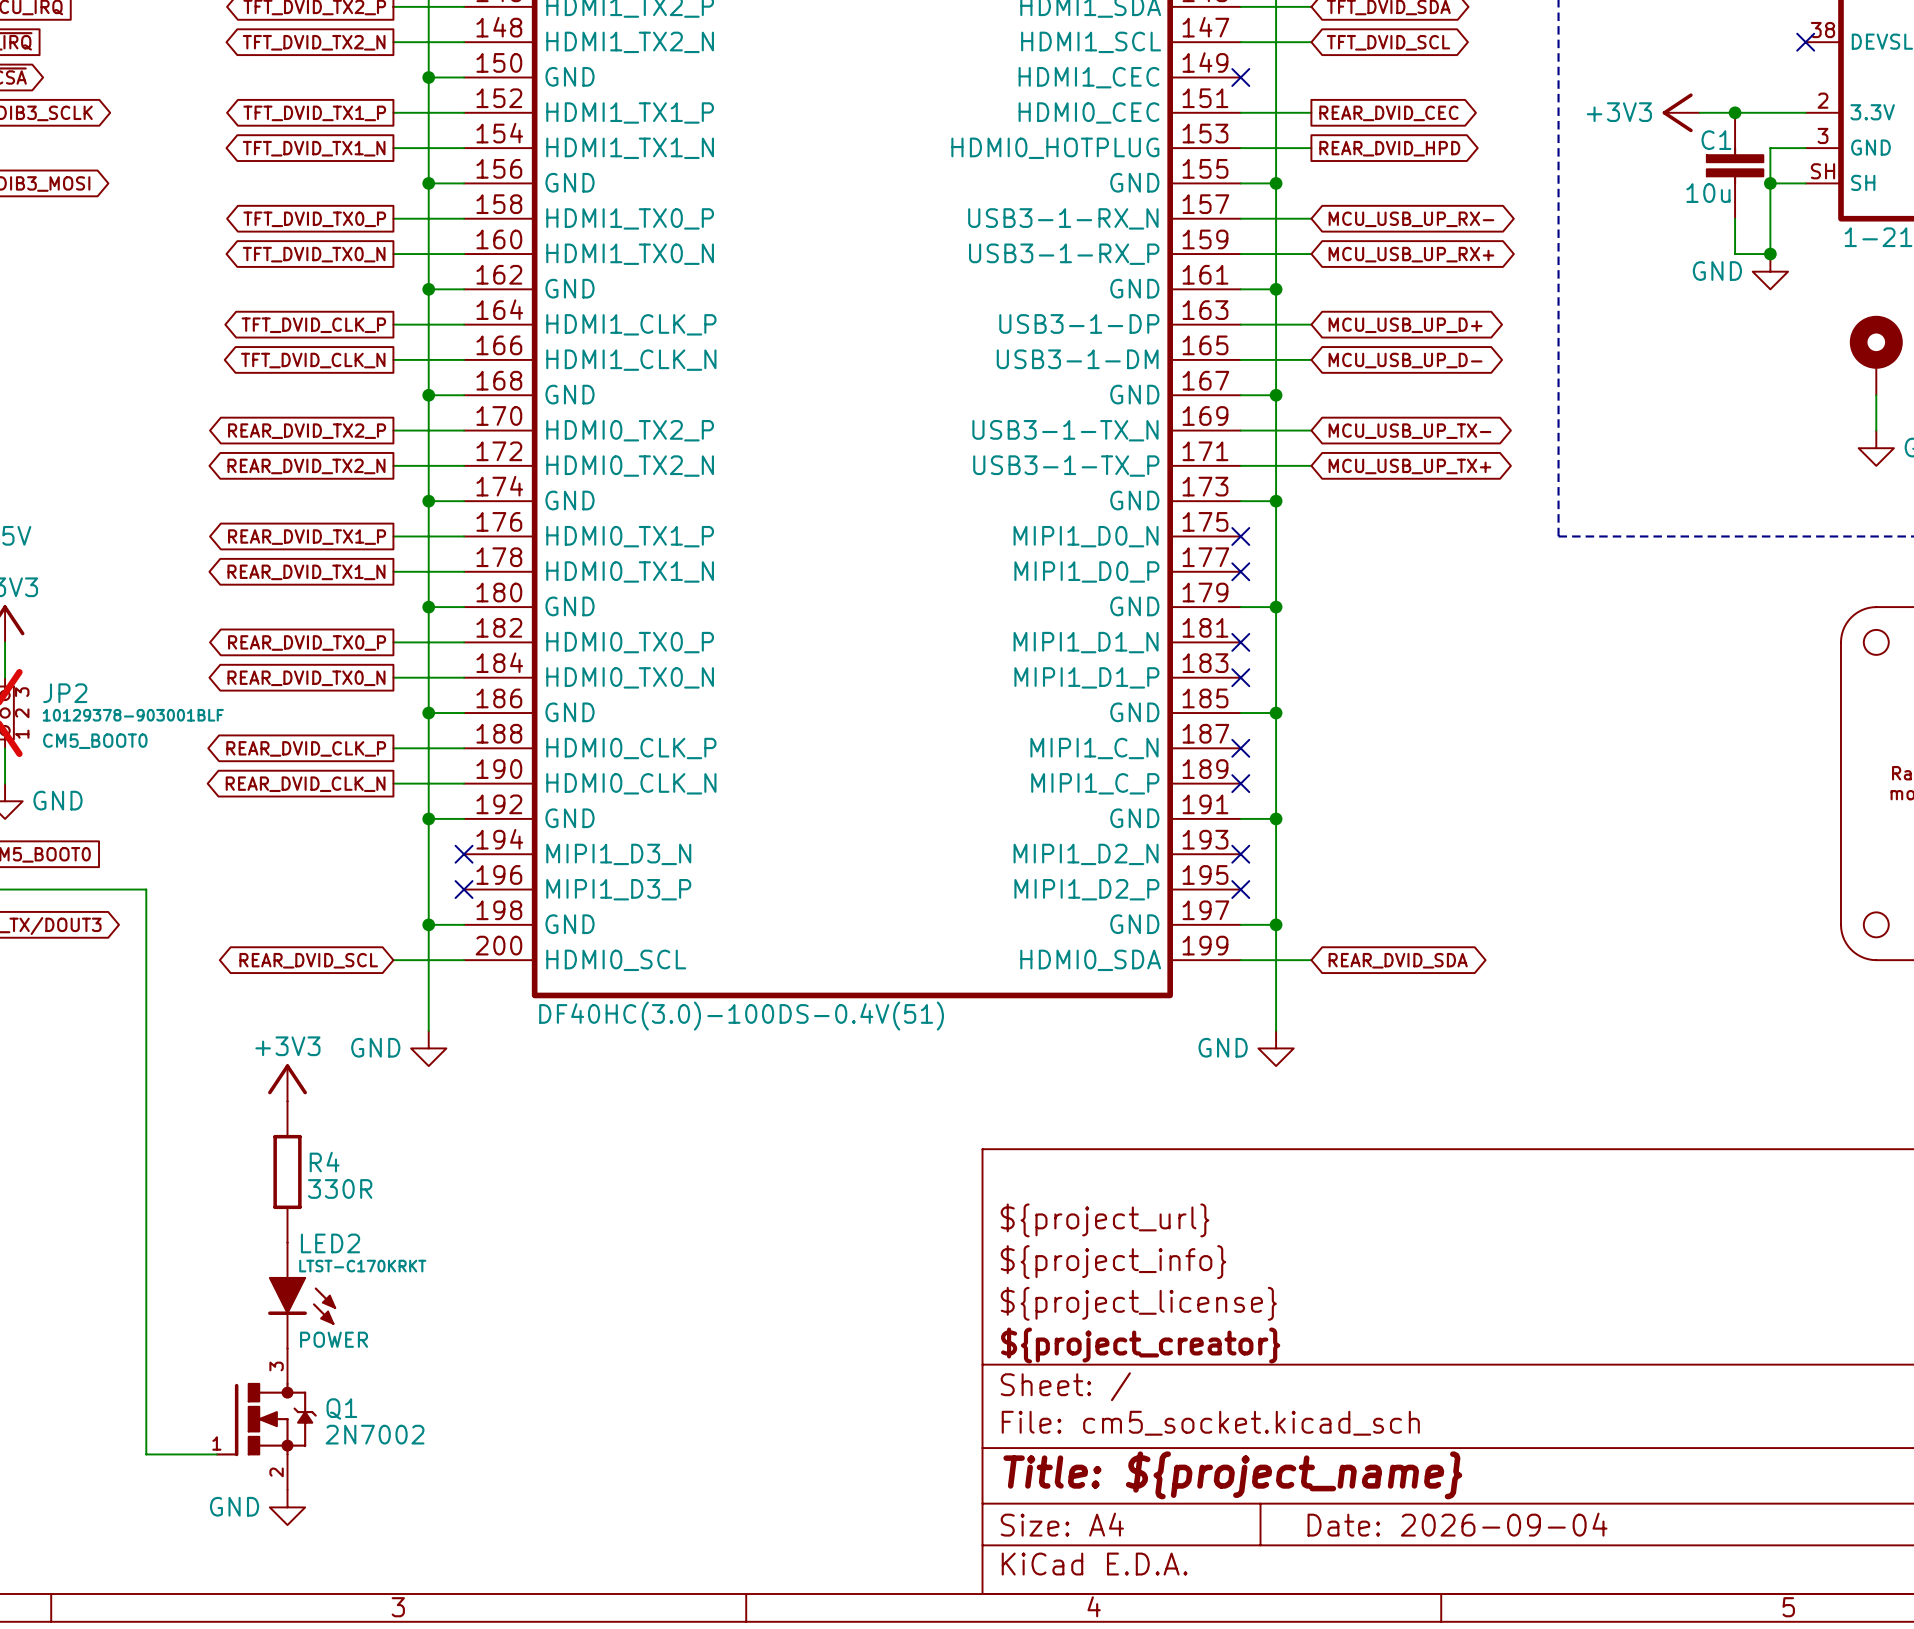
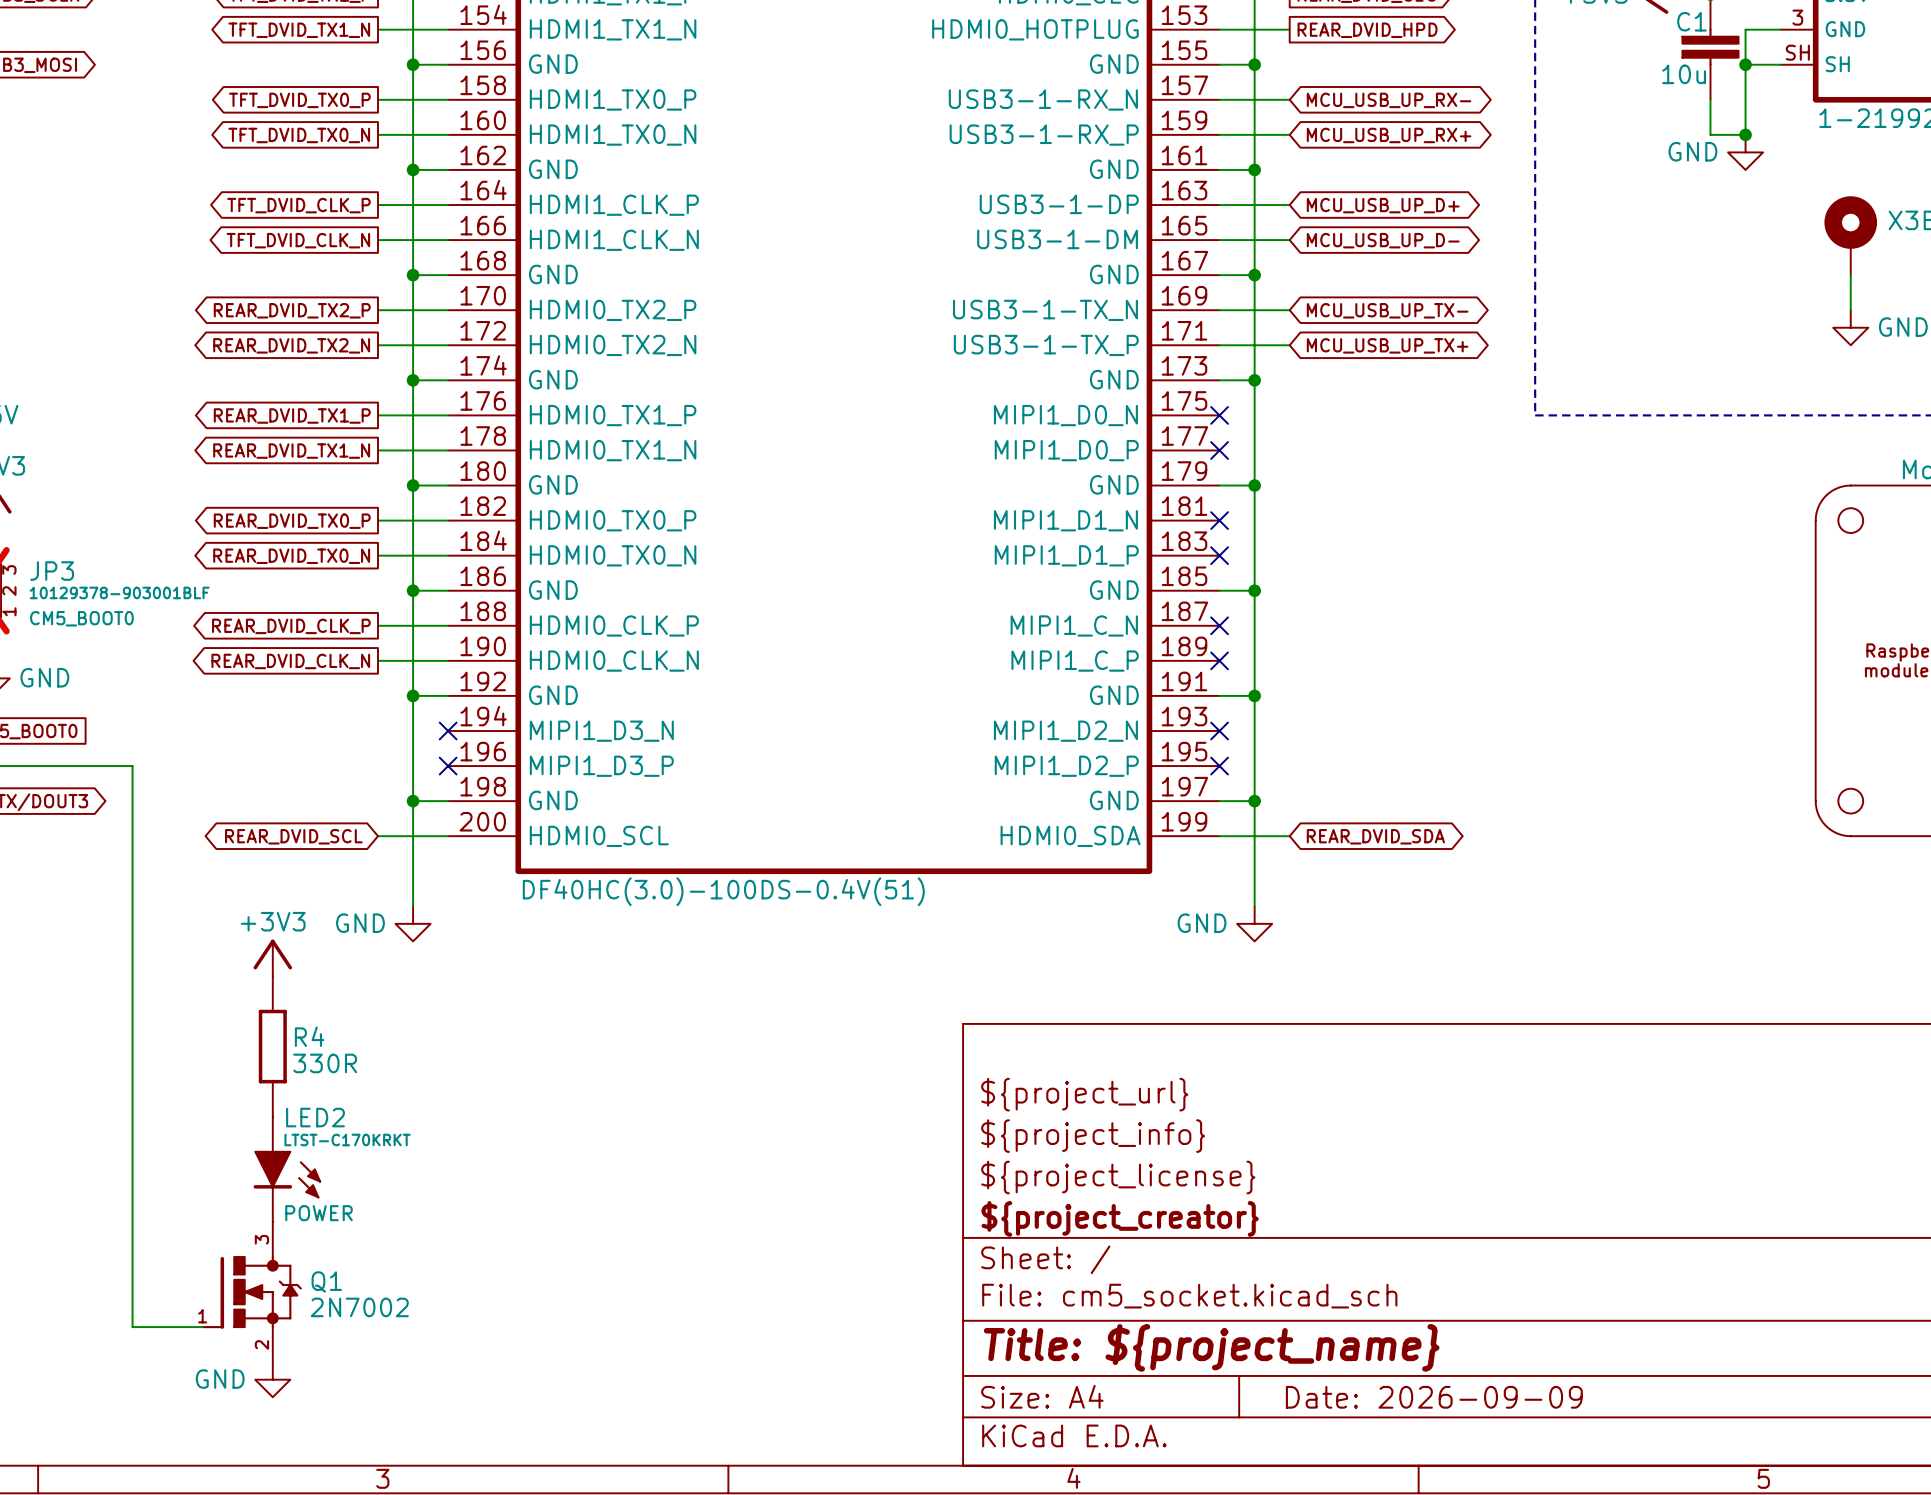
JP2 name: JP2 (65, 693) -> JP3 (52, 571)
title block: Date: 2026-09-04 (1457, 1524) -> Date: 2026-09-09 (1434, 1397)

